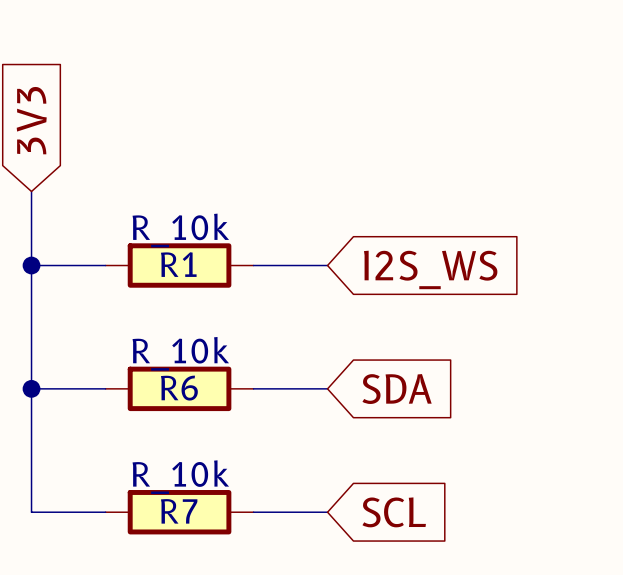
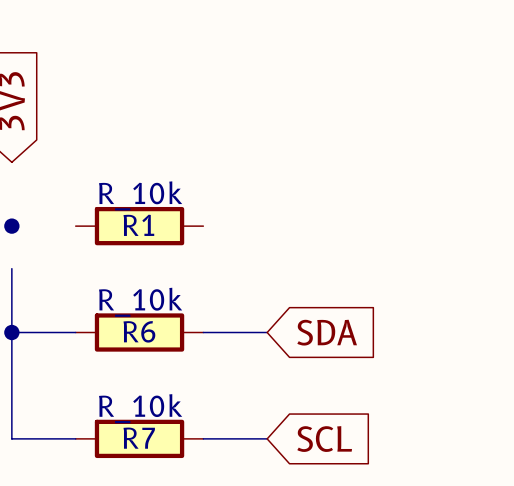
wire: (31, 191) (31, 314) -> none
wire: (31, 265) (105, 265) -> none
wire: (253, 265) (327, 265) -> none
global label: I2S_WS (430, 269) -> none

